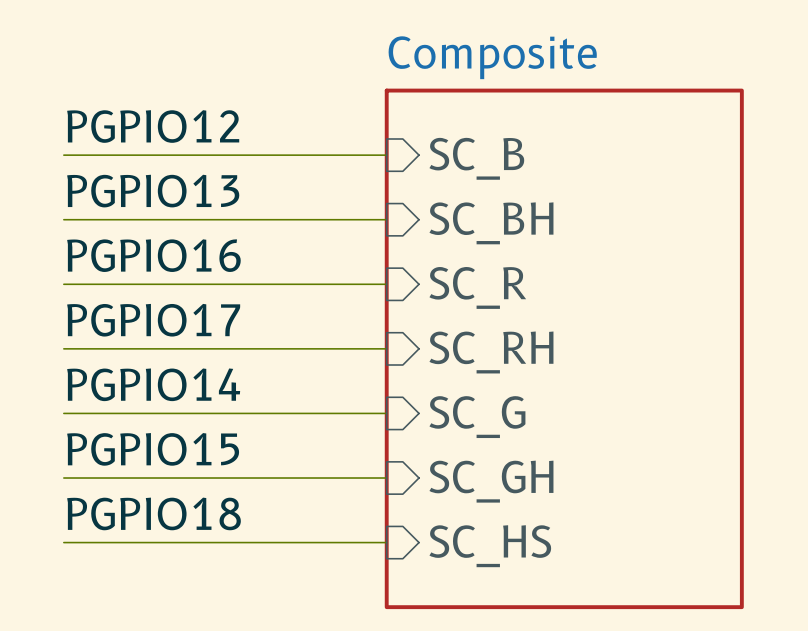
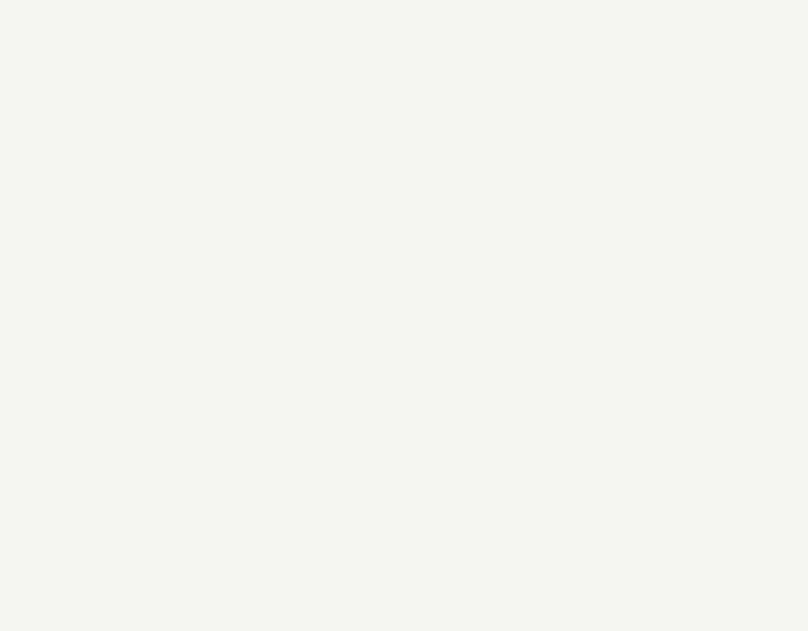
label: PGPIO12 (153, 126) -> none
wire: (63, 155) (386, 155) -> none
sheet pin: SC_B (476, 158) -> none
label: PGPIO13 (153, 191) -> none
wire: (63, 219) (386, 219) -> none
sheet pin: SC_BH (491, 223) -> none
label: PGPIO16 (153, 255) -> none
wire: (63, 284) (386, 284) -> none
sheet pin: SC_R (477, 287) -> none
label: PGPIO17 (153, 320) -> none
wire: (63, 348) (386, 348) -> none
sheet Composite: (564, 348) -> none
sheet pin: SC_RH (491, 352) -> none
label: PGPIO14 (153, 384) -> none
wire: (63, 413) (386, 413) -> none
sheet pin: SC_G (477, 417) -> none
label: PGPIO15 (153, 449) -> none
wire: (63, 478) (386, 478) -> none
sheet pin: SC_GH (491, 481) -> none
label: PGPIO18 (153, 513) -> none
wire: (63, 542) (386, 542) -> none
sheet pin: SC_HS (490, 546) -> none

